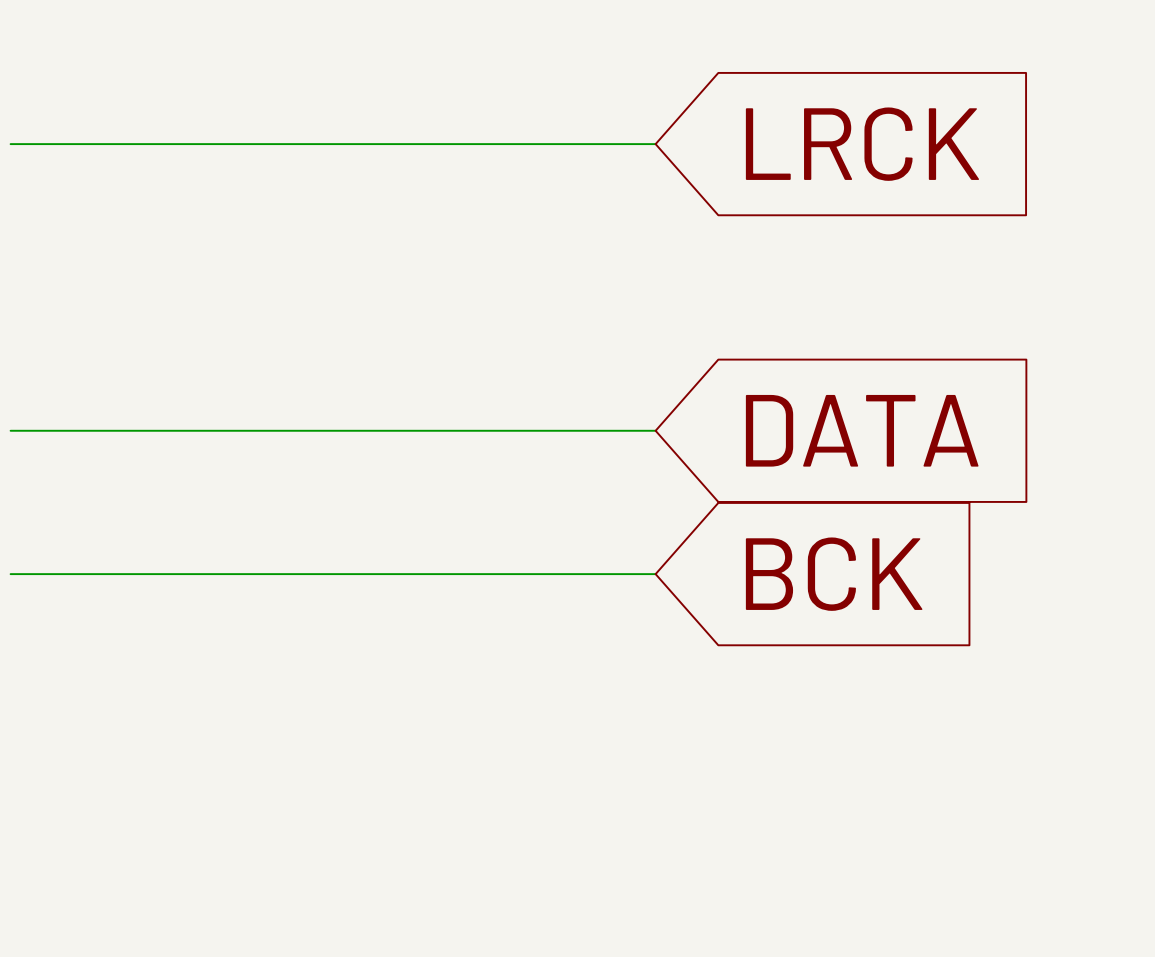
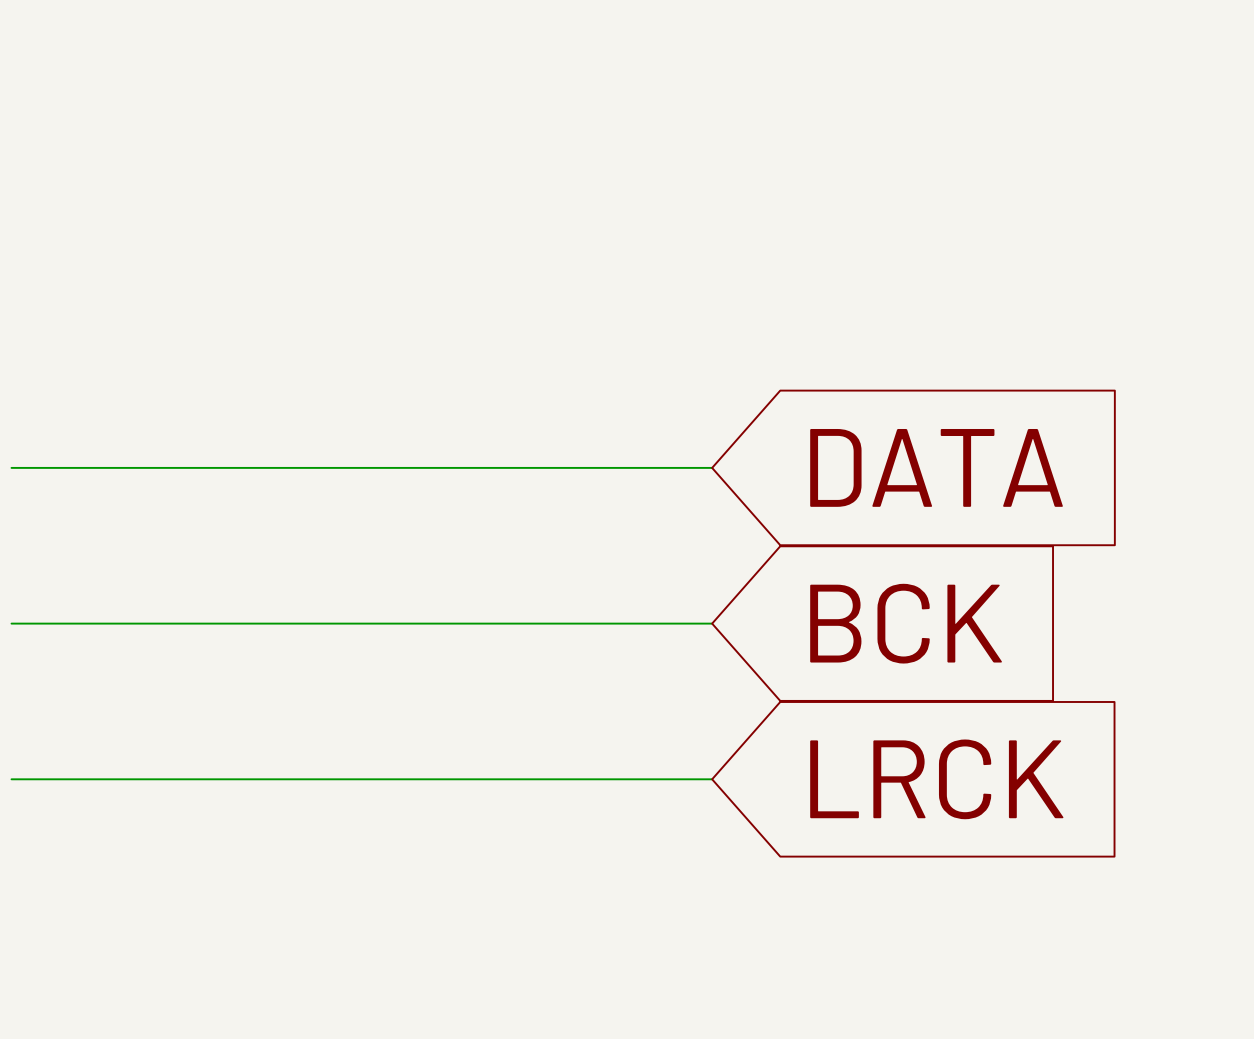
wire: (10, 144) (655, 144) -> (11, 779) (712, 779)
global label position: LRCK (862, 144) -> LRCK (936, 779)

